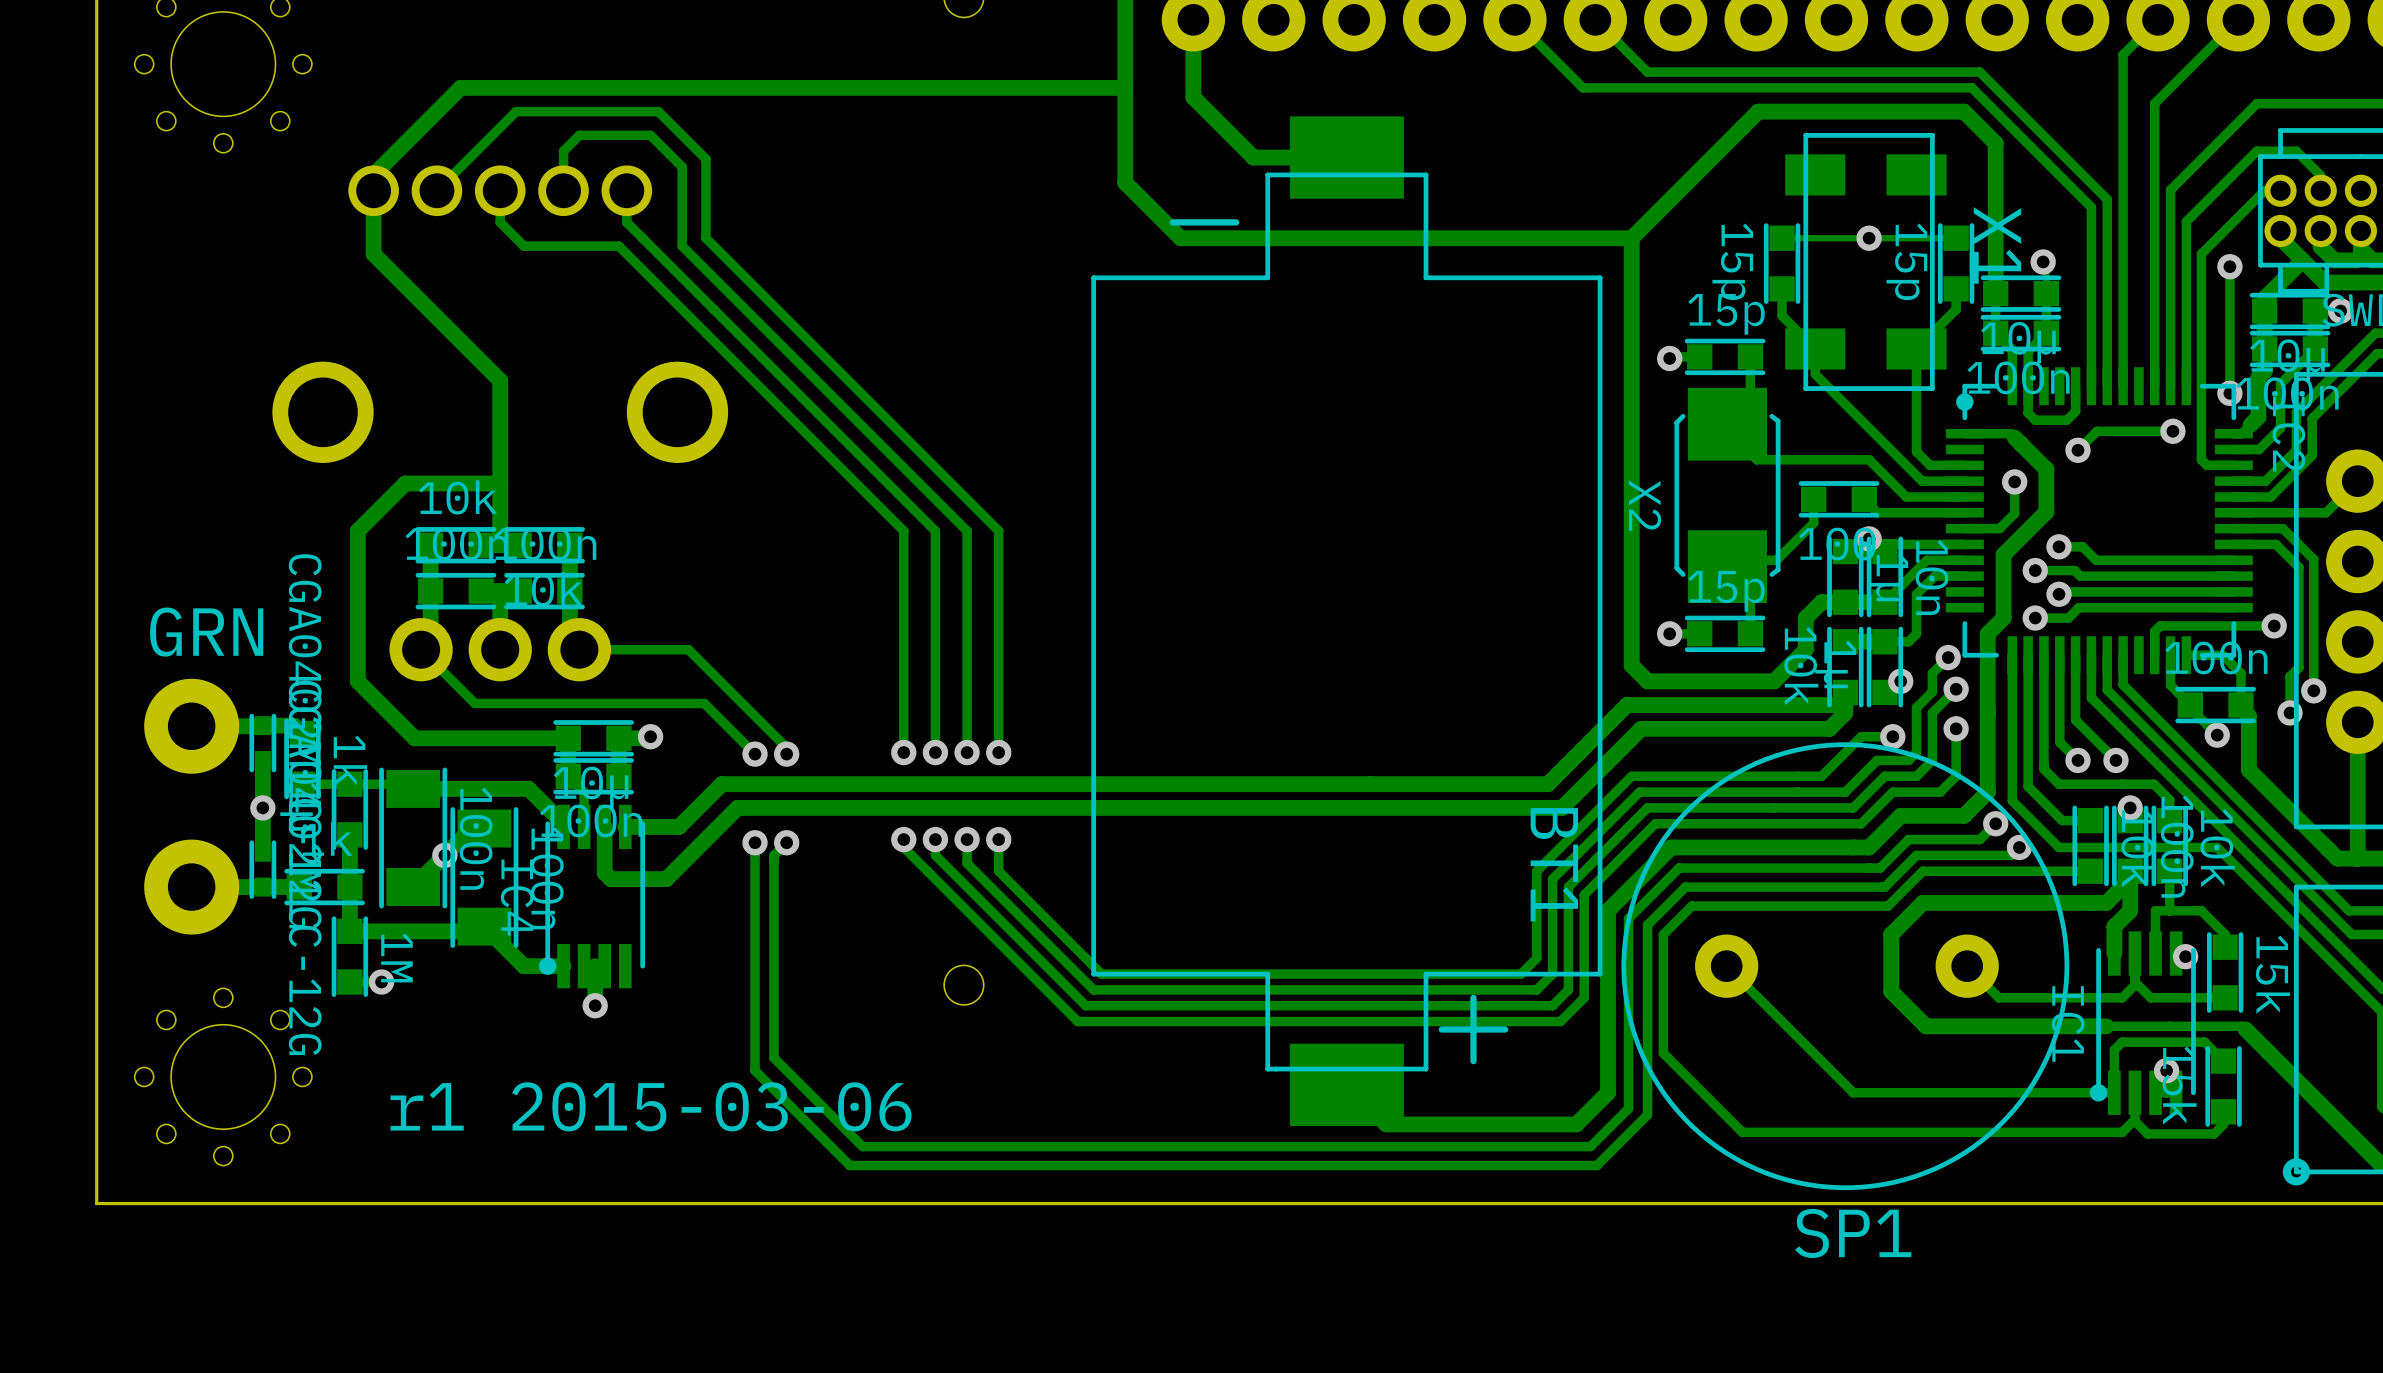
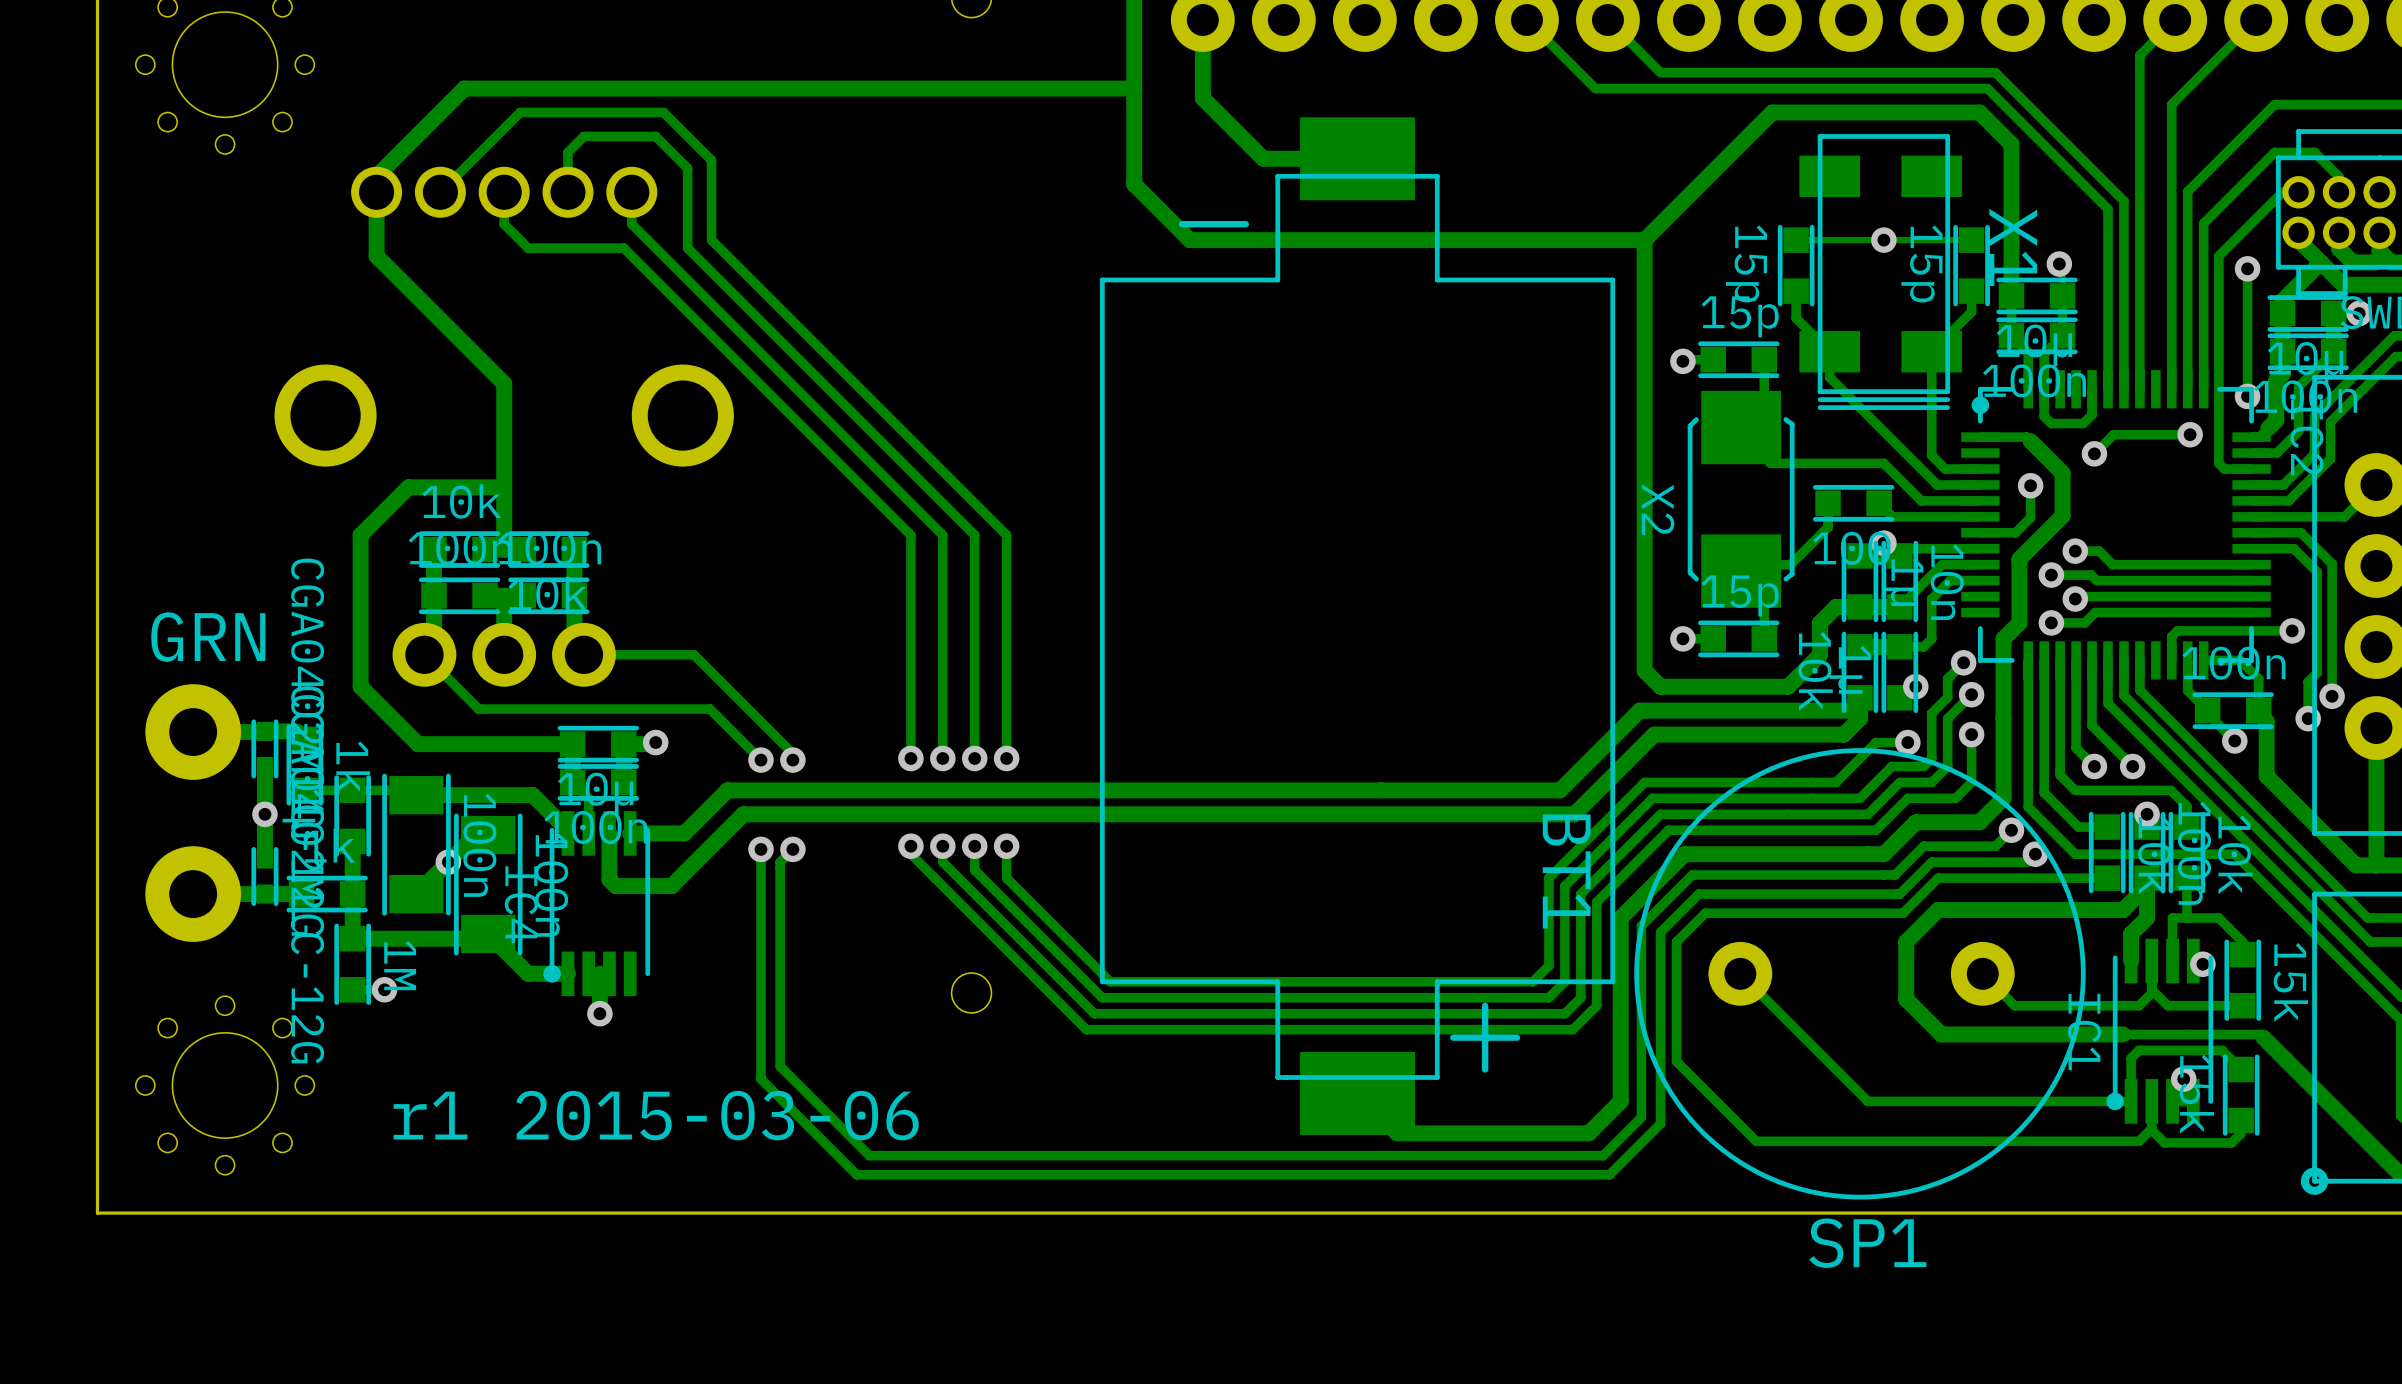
X1 footprint: [1785, 133, 1947, 391] -> [1799, 134, 1963, 410]

